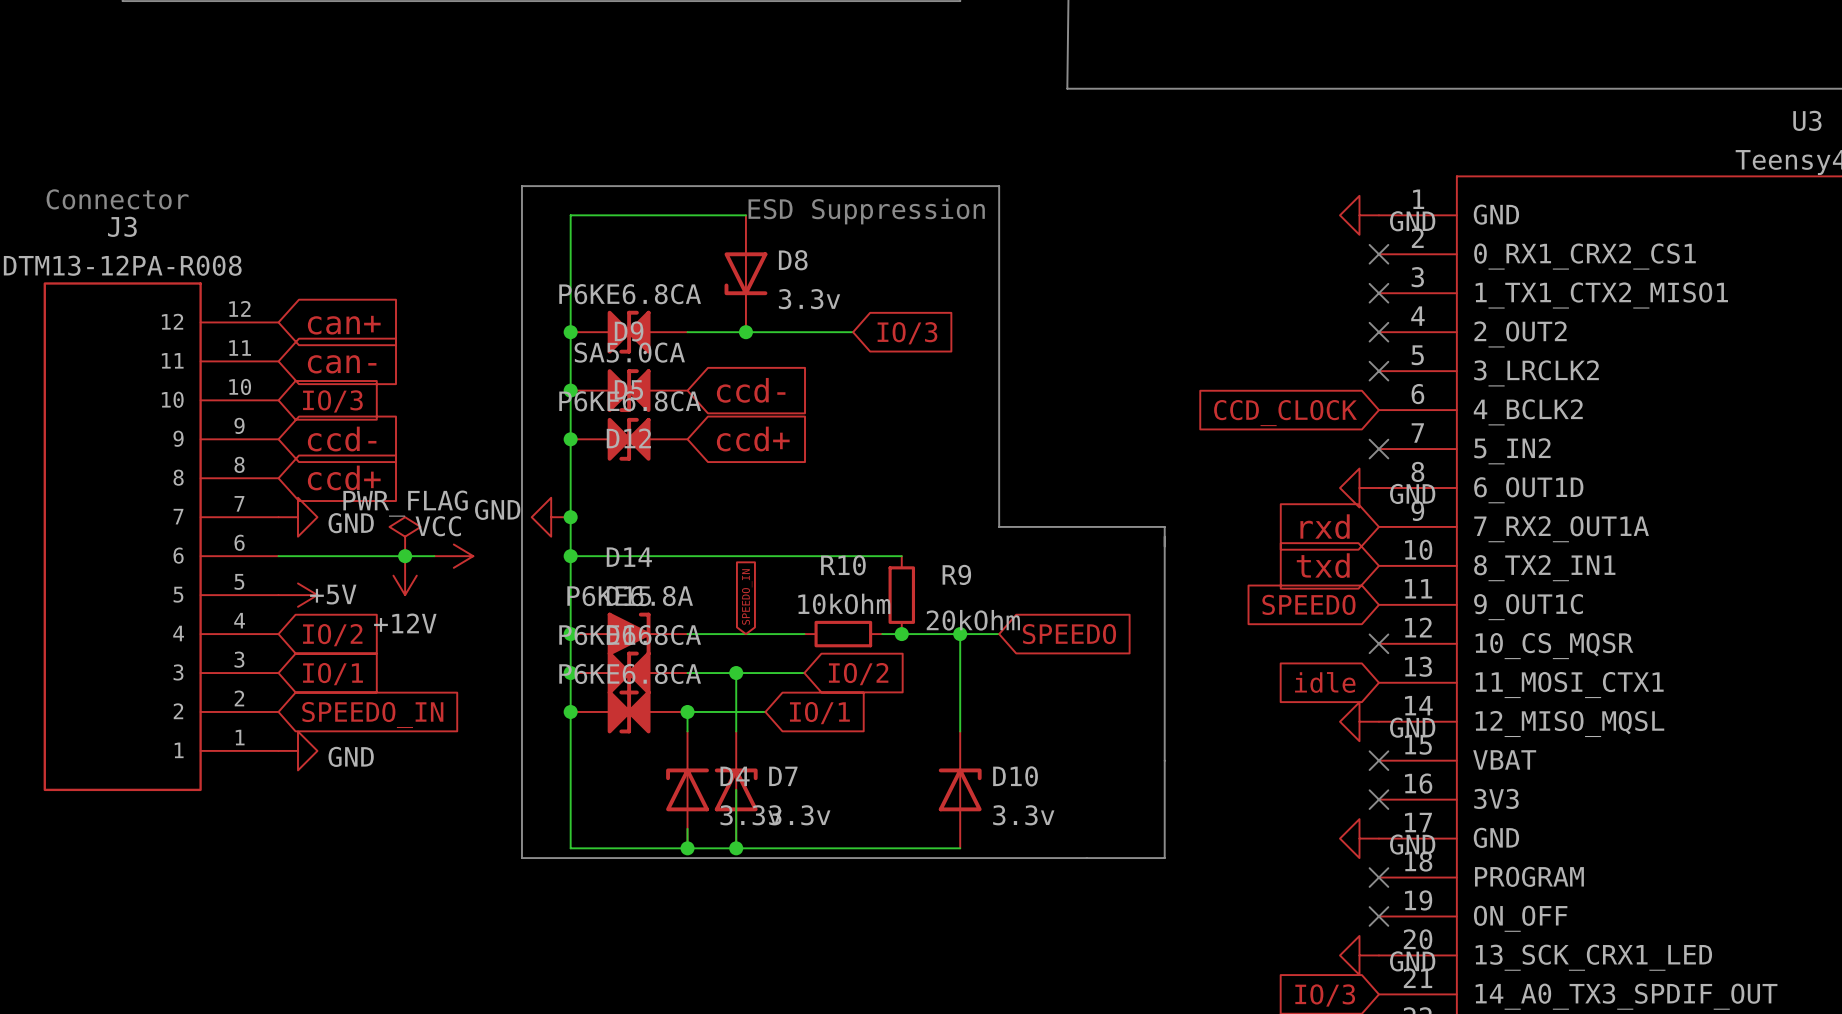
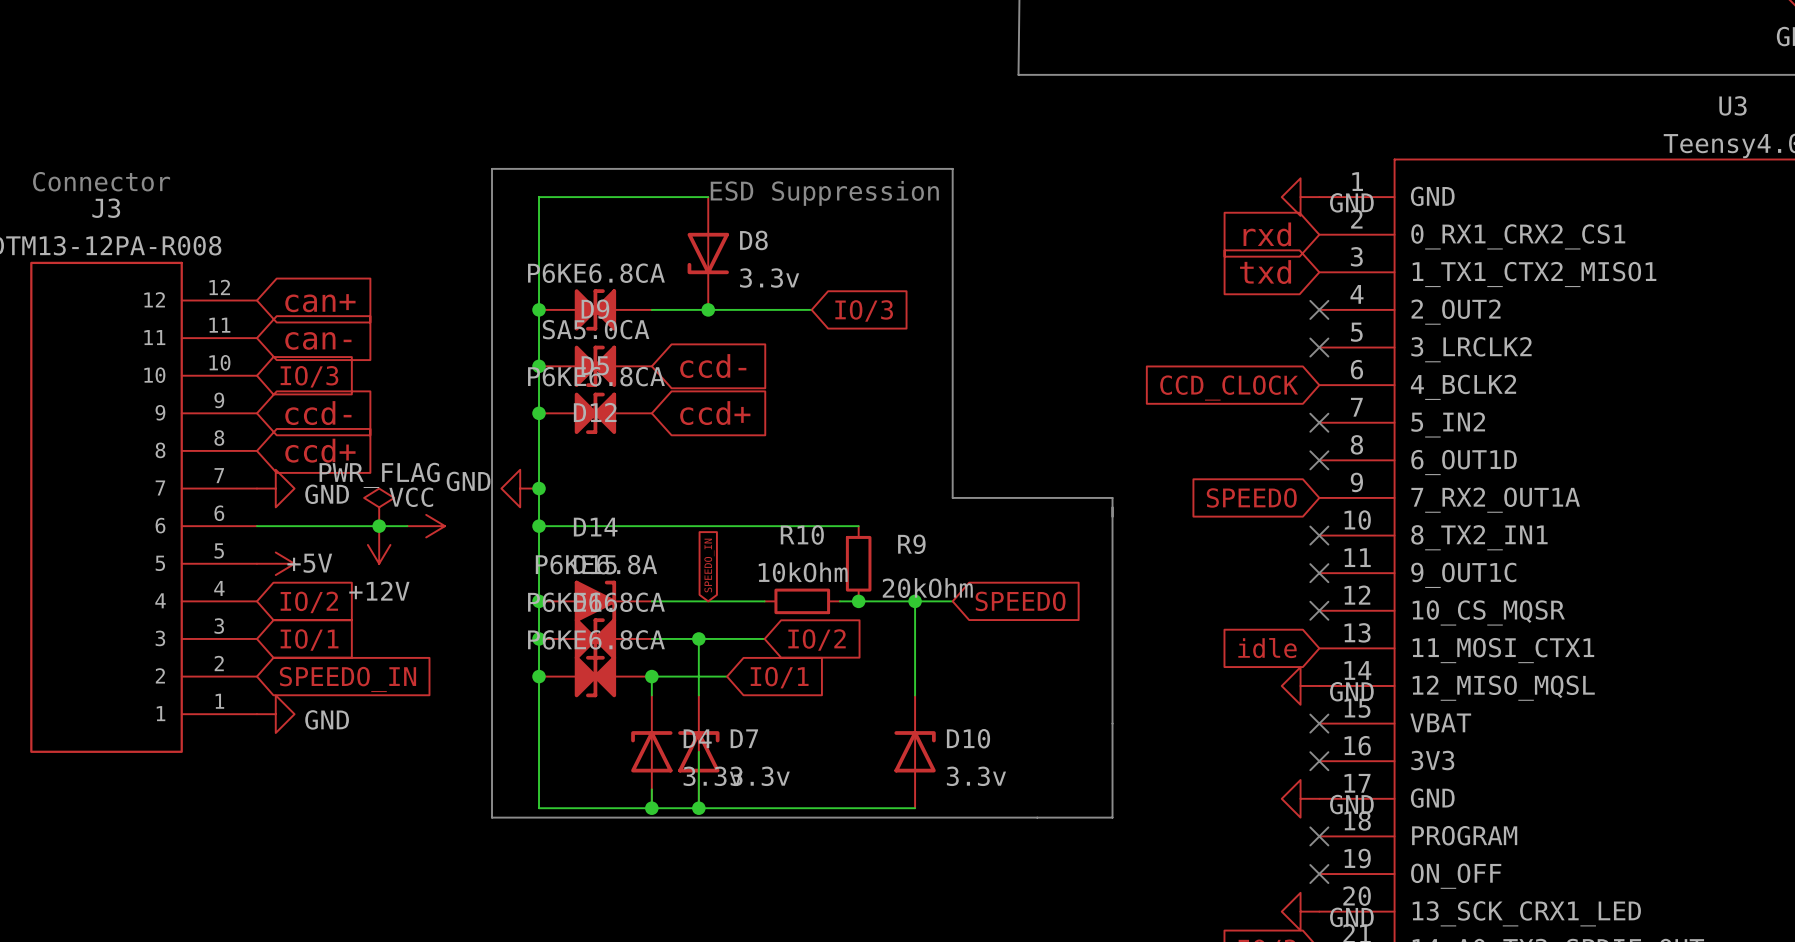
global label: none -> rxd (1267, 234)
no-connect mark: (1378, 254) -> none
no-connect mark: (1378, 293) -> none
power symbol: GND (1359, 488) -> none
no-connect mark: none -> (1319, 460)
global label: rxd (1325, 526) -> SPEEDO (1251, 497)
global label position: txd (1323, 565) -> txd (1265, 272)
no-connect mark: none -> (1319, 535)
global label: SPEEDO (1308, 604) -> none
no-connect mark: none -> (1319, 573)

